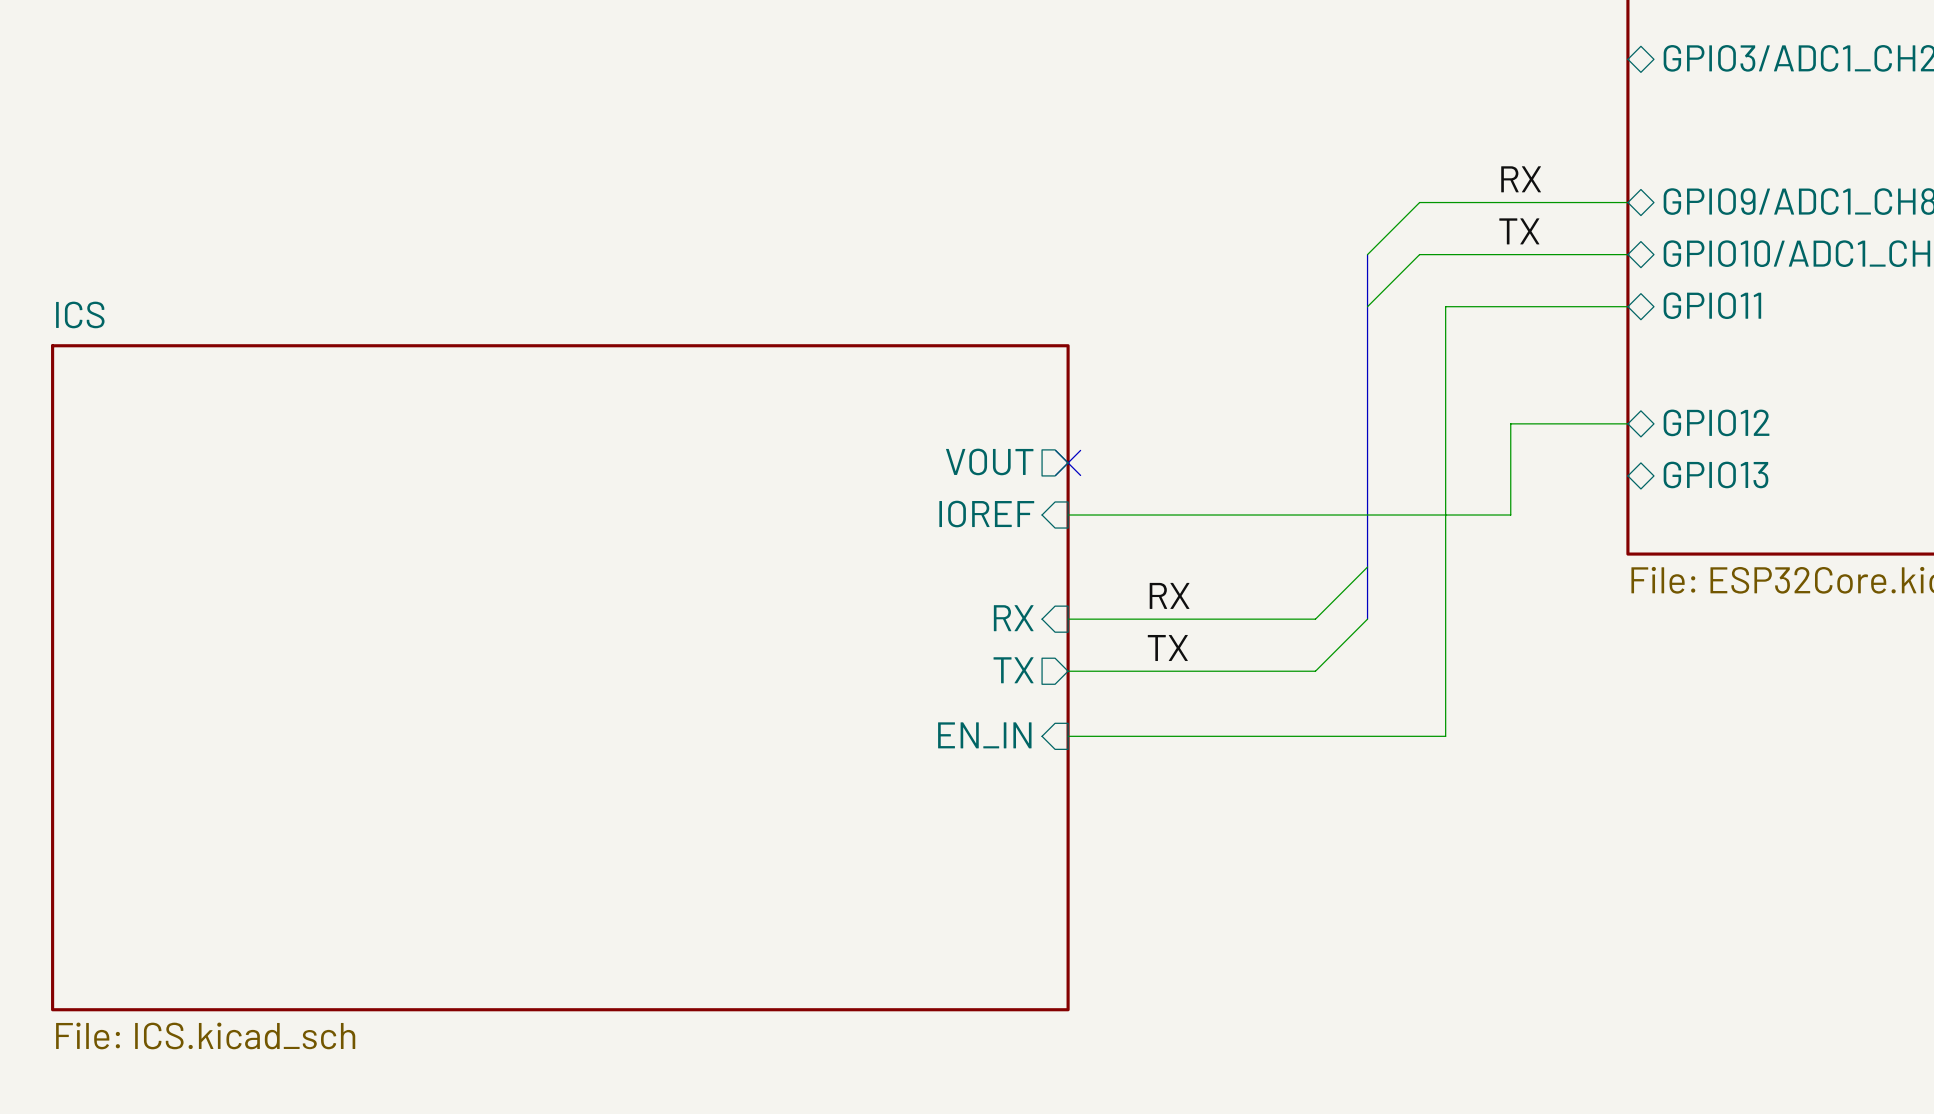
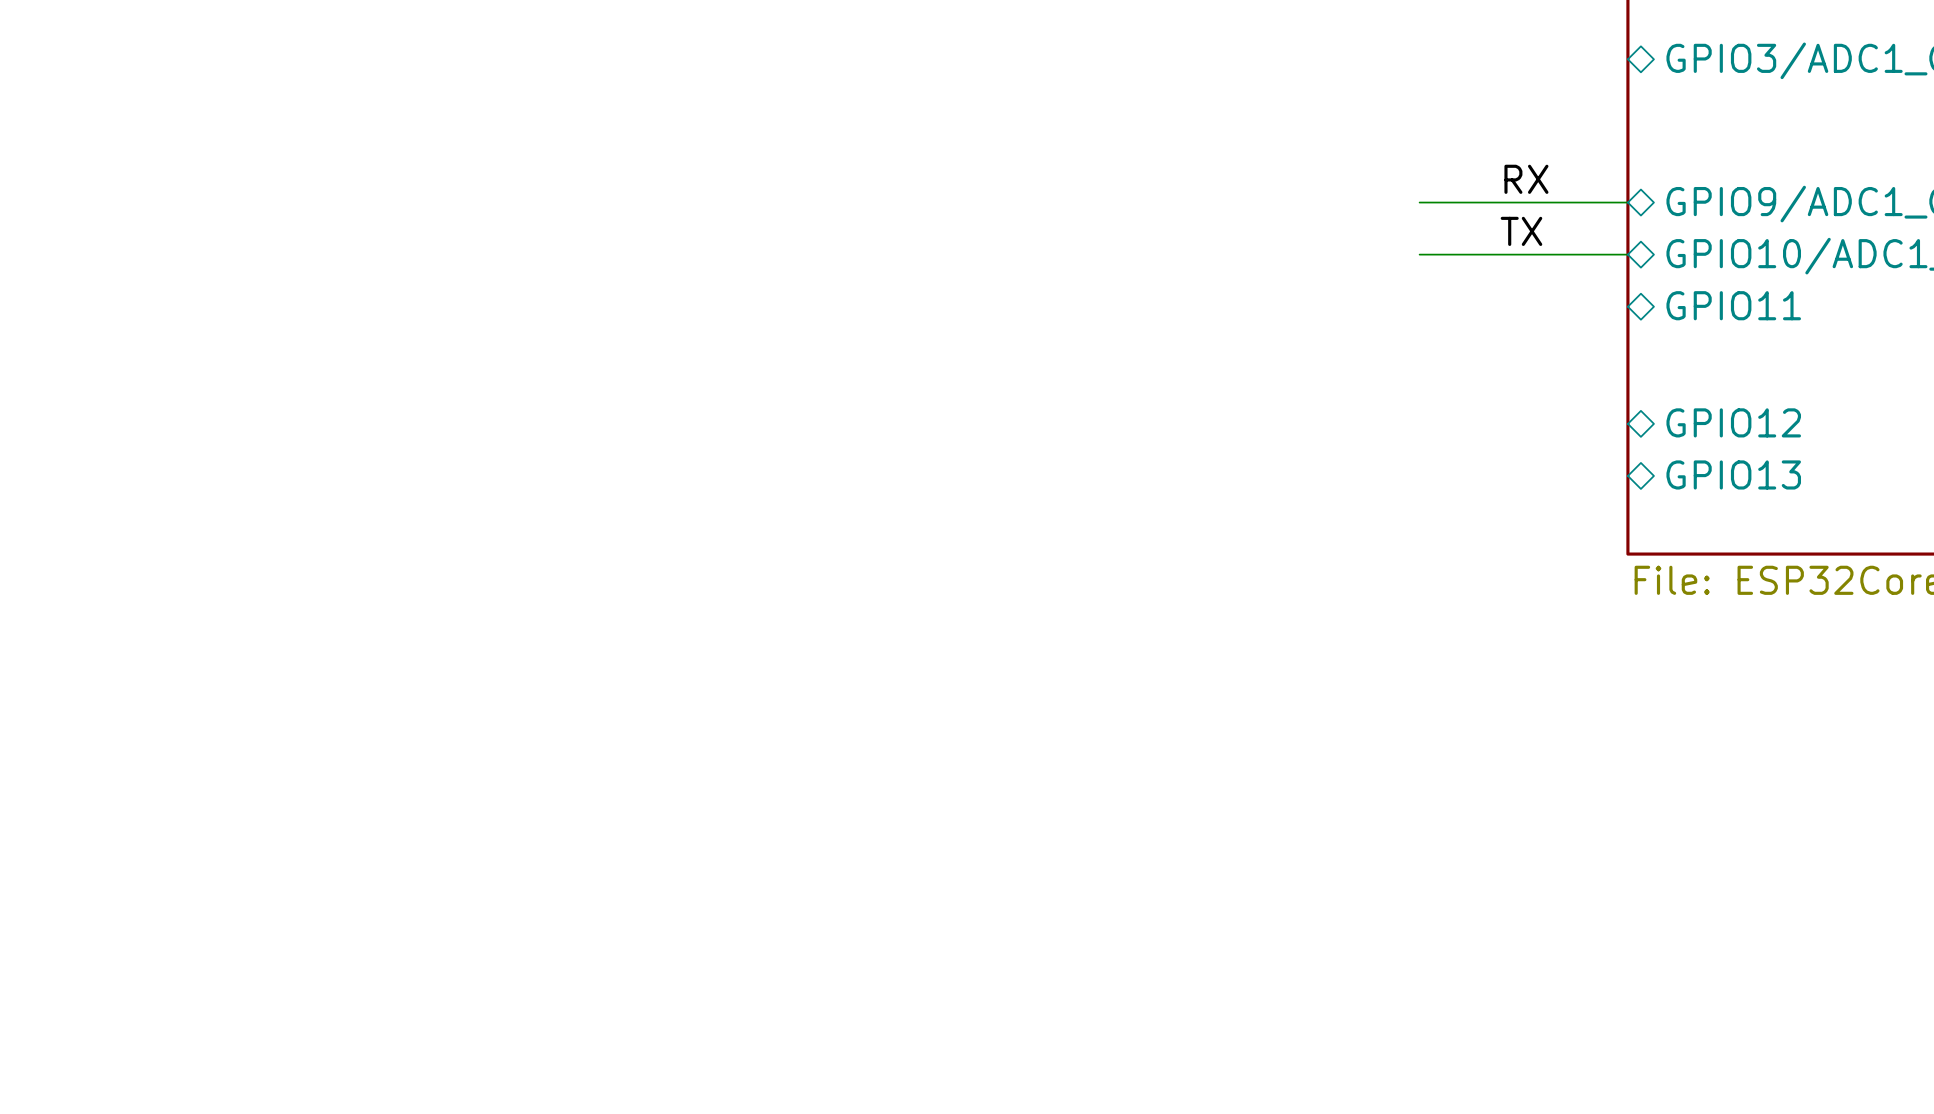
wire: (1419, 202) (1367, 254) -> none
bus: (1367, 254) (1367, 619) -> none
wire: (1419, 254) (1367, 306) -> none
wire: (1627, 306) (1445, 306) (1445, 736) (1068, 736) -> none
wire: (1627, 423) (1510, 423) (1510, 515) (1068, 515) -> none
sheet pin: VOUT (989, 461) -> none
no-connect mark: (1068, 462) -> none
sheet pin: IOREF (986, 514) -> none
wire: (1367, 567) (1315, 619) (1068, 619) -> none
label: RX (1169, 595) -> none
sheet pin: RX (1013, 618) -> none
wire: (1367, 619) (1315, 671) (1068, 671) -> none
label: TX (1167, 647) -> none
sheet pin: TX (1013, 670) -> none
sheet ICS: File: ICS.kicad_sch (560, 677) -> none
sheet pin: EN_IN (984, 735) -> none

